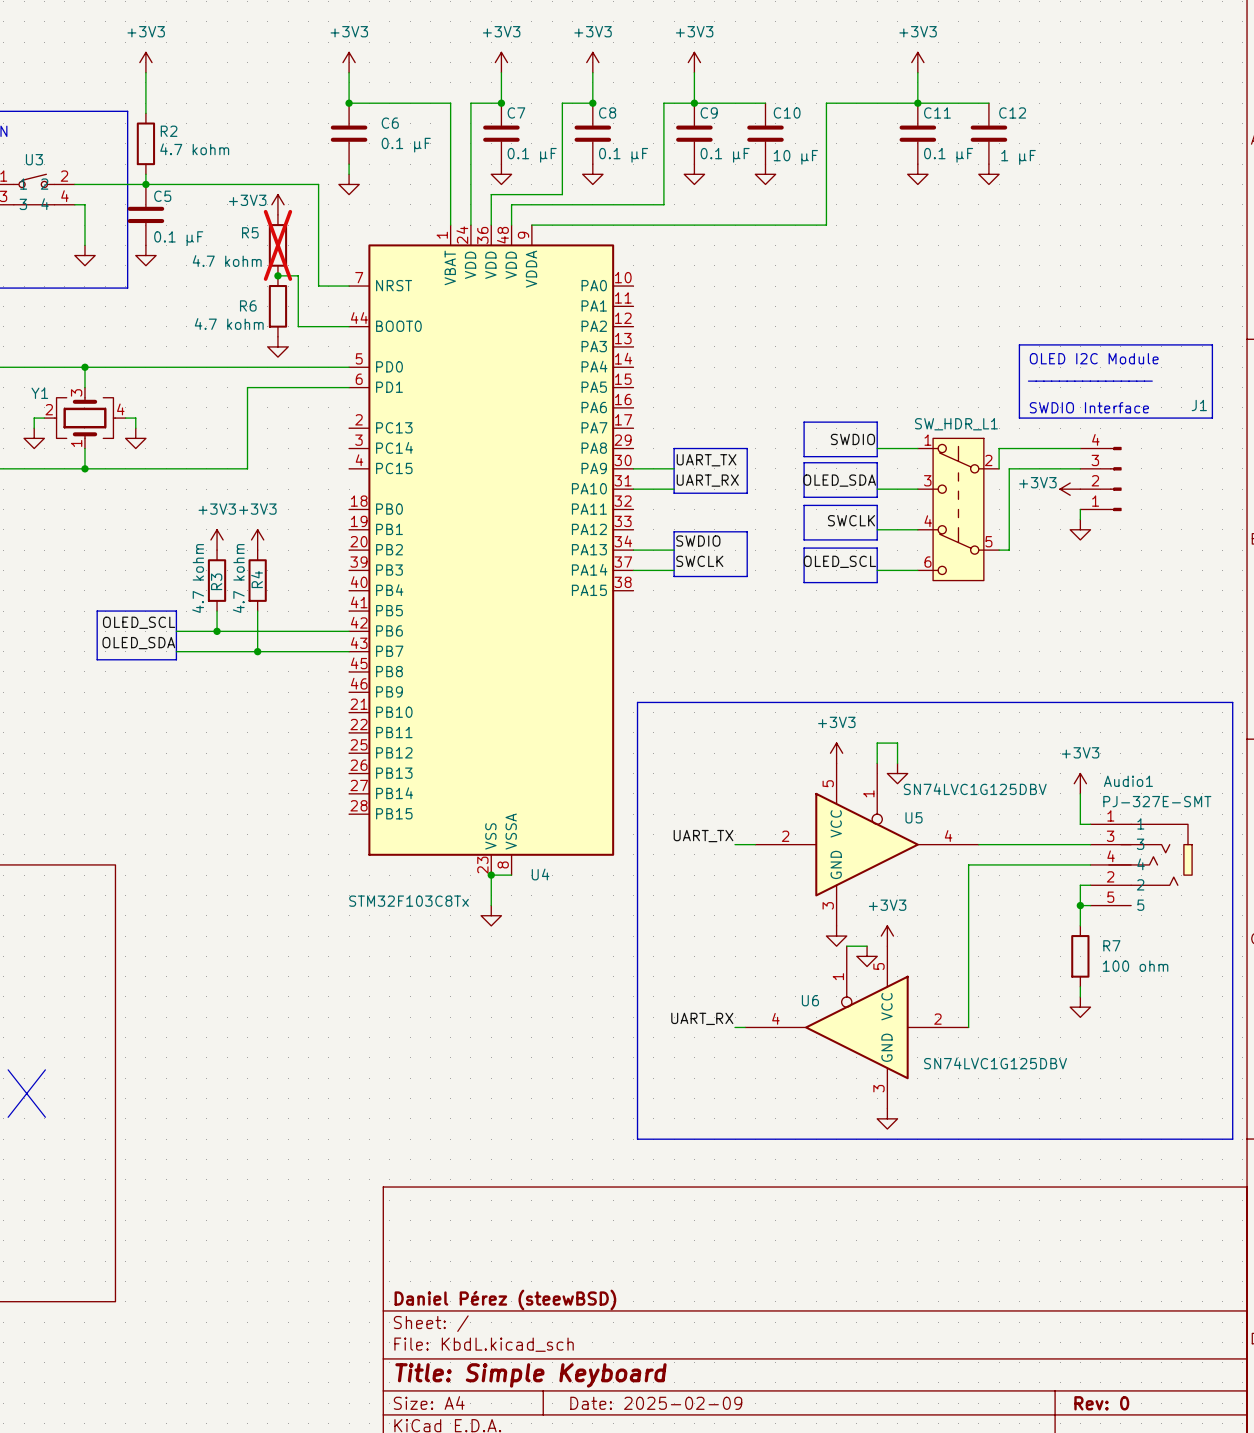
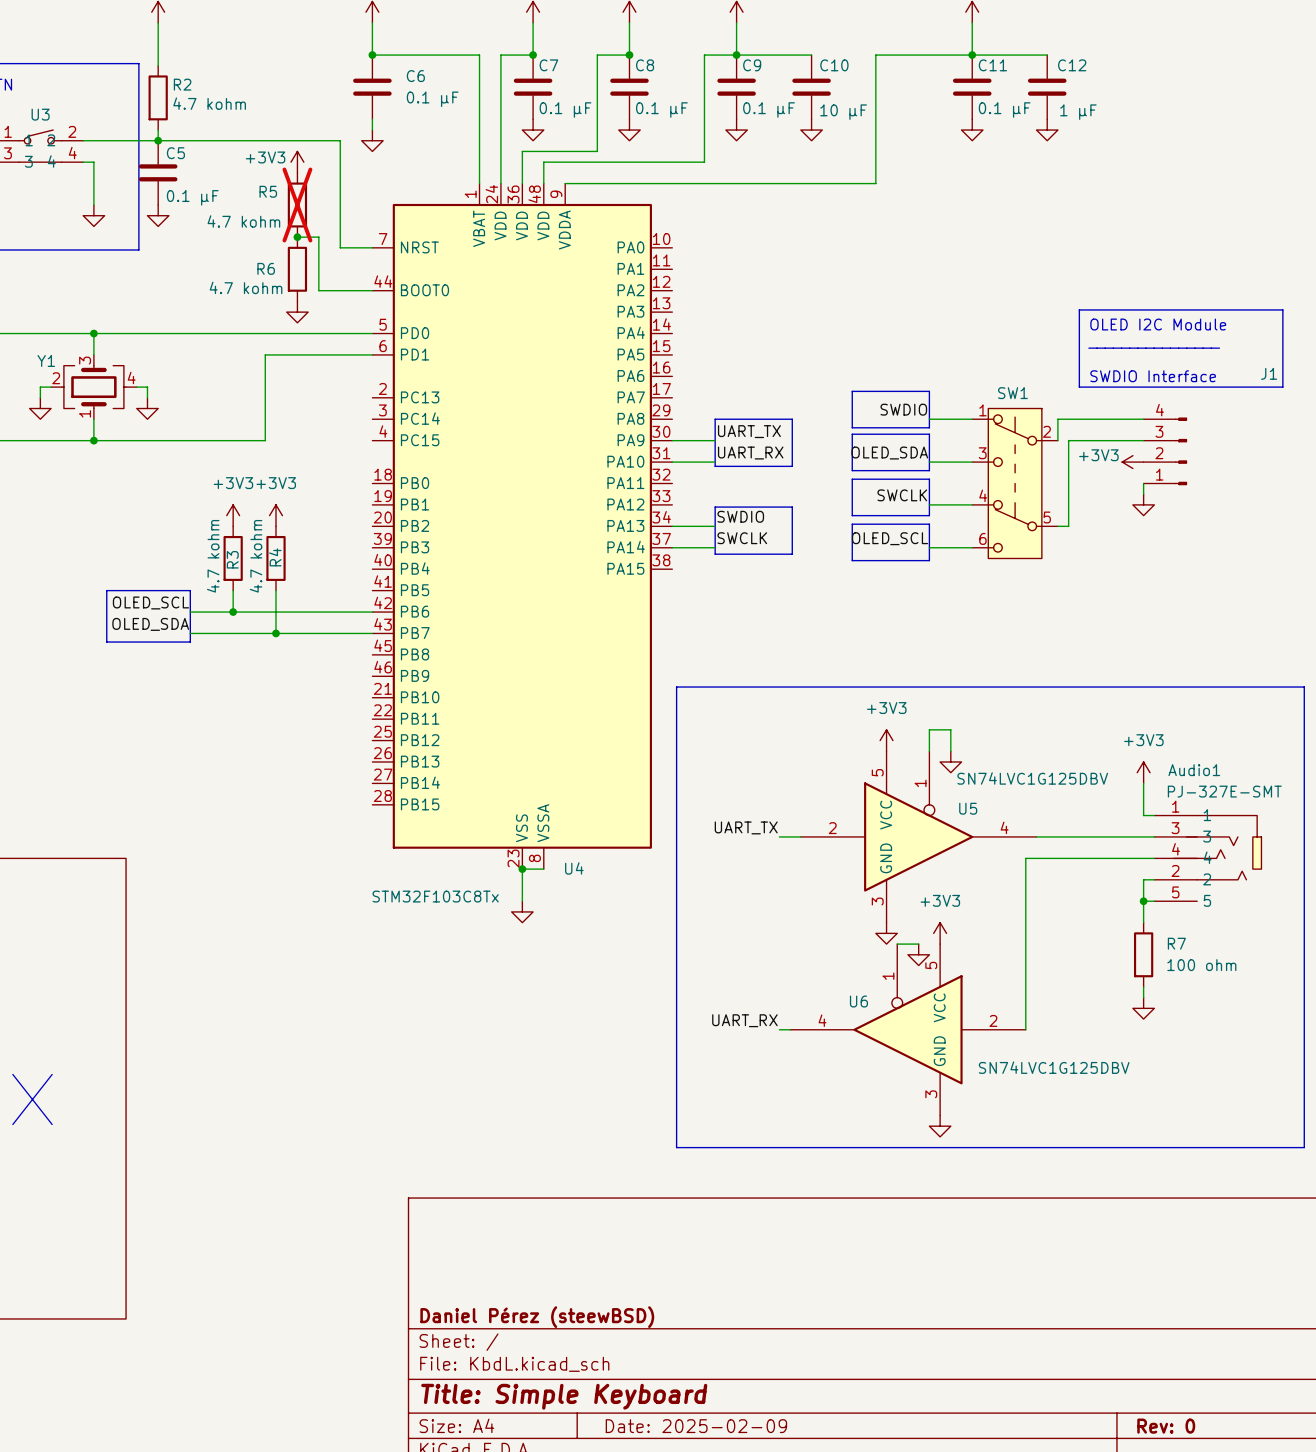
SW_HDR_L1 name: SW_HDR_L1 (956, 424) -> SW1 (1012, 393)

